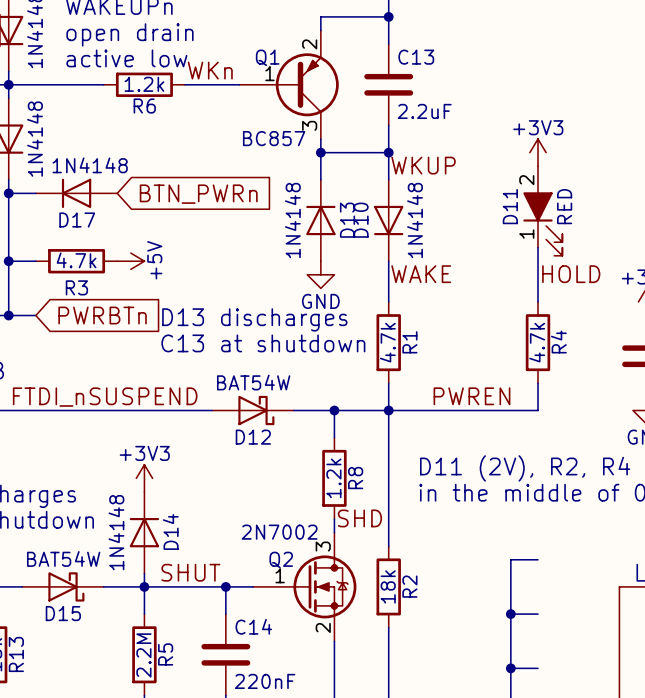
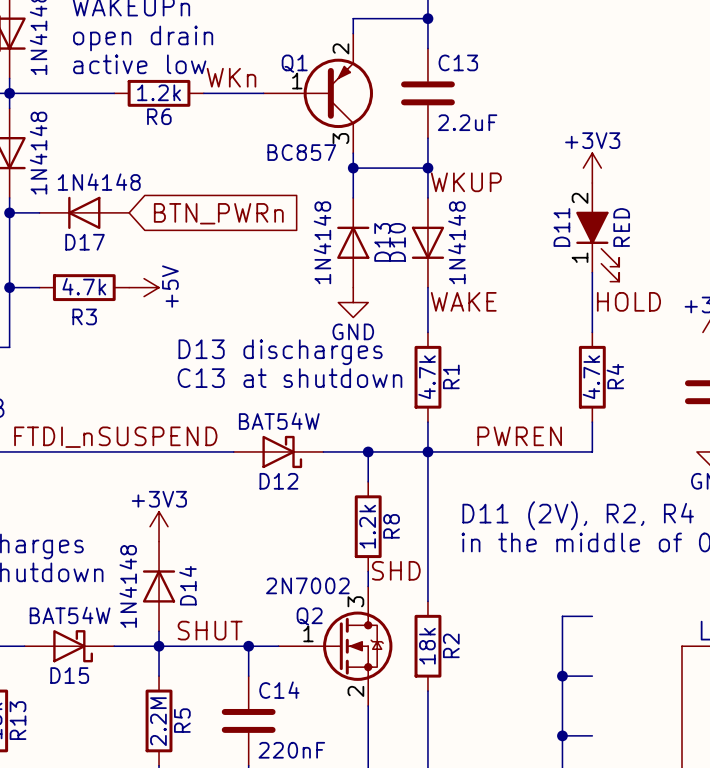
wire: (8, 315) (35, 315) -> none
junction: (8, 315) -> none
global label: PWRBTn (102, 315) -> none

